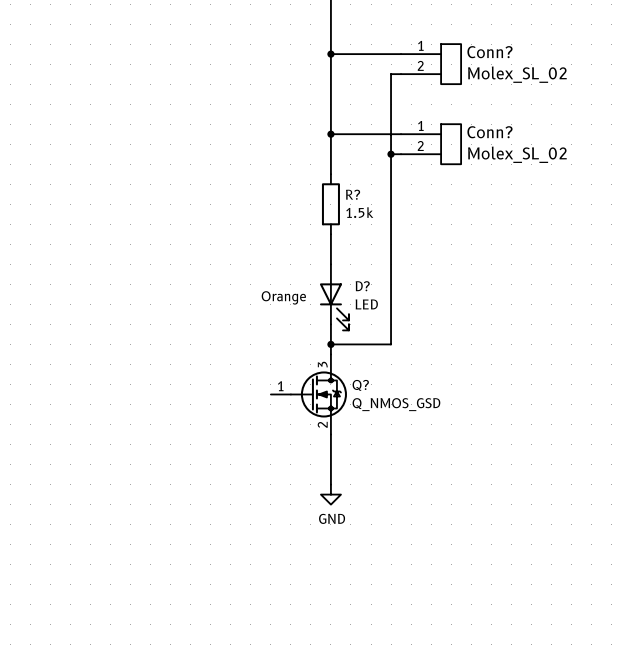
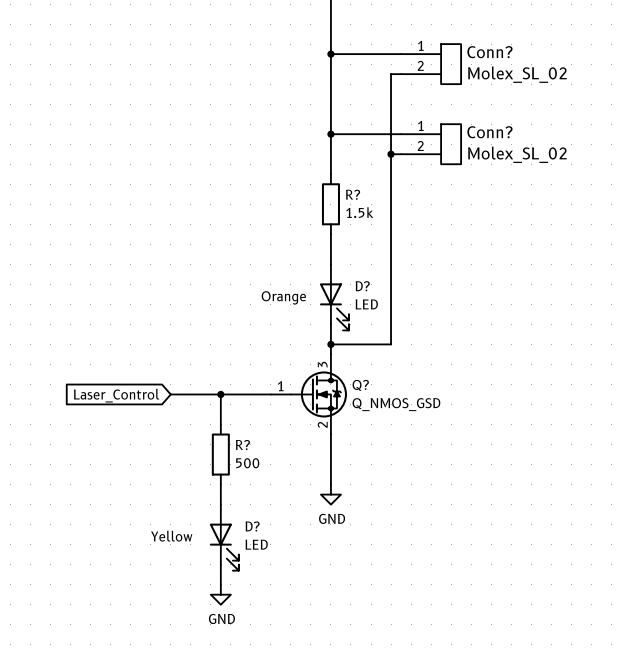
wire: none -> (170, 394) (270, 394)
wire: none -> (220, 394) (220, 424)
junction: none -> (220, 394)
global label: none -> Laser_Control (116, 395)
R?: none -> 500 (220, 454)
wire: none -> (220, 484) (220, 504)
text: none -> Yellow (171, 536)
D?: none -> LED (224, 537)
wire: none -> (220, 564) (220, 584)
power symbol: none -> GND (220, 594)

